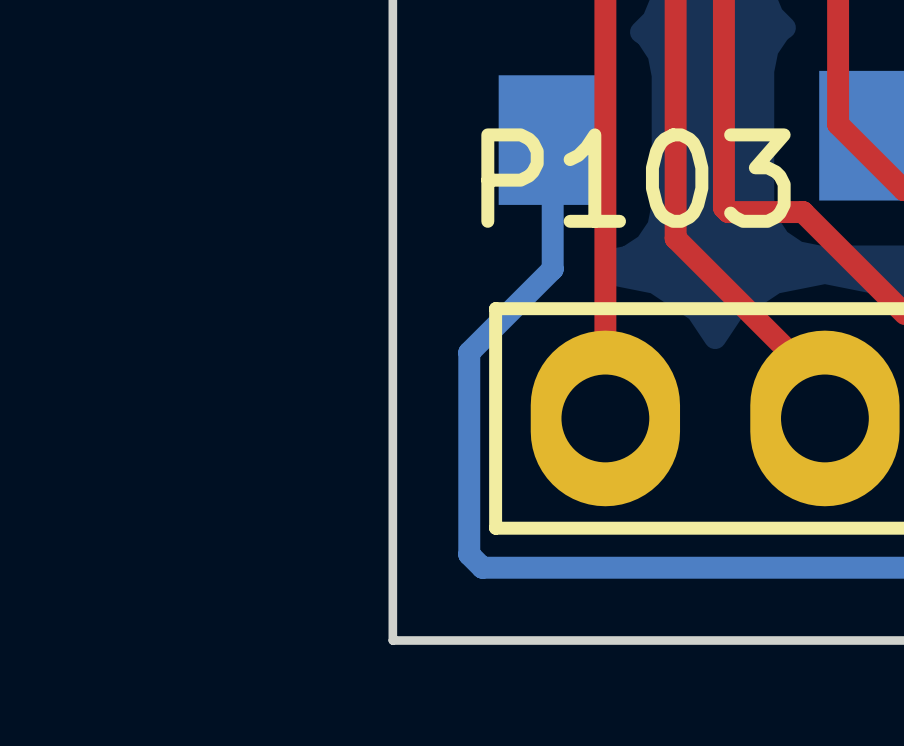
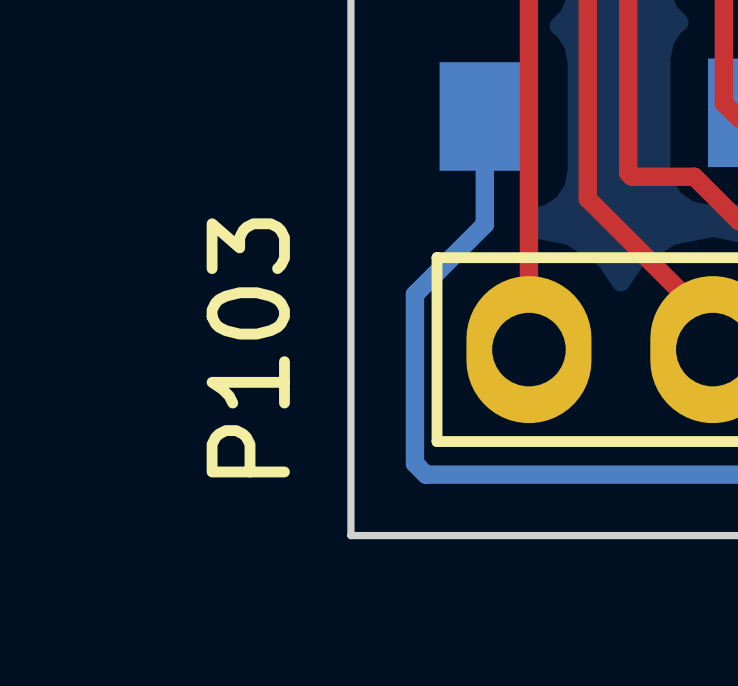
P103 name rotation: 0° (635, 178) -> 90° counterclockwise (248, 347)
P103 name position: P103 (635, 178) -> P103 (248, 347)

